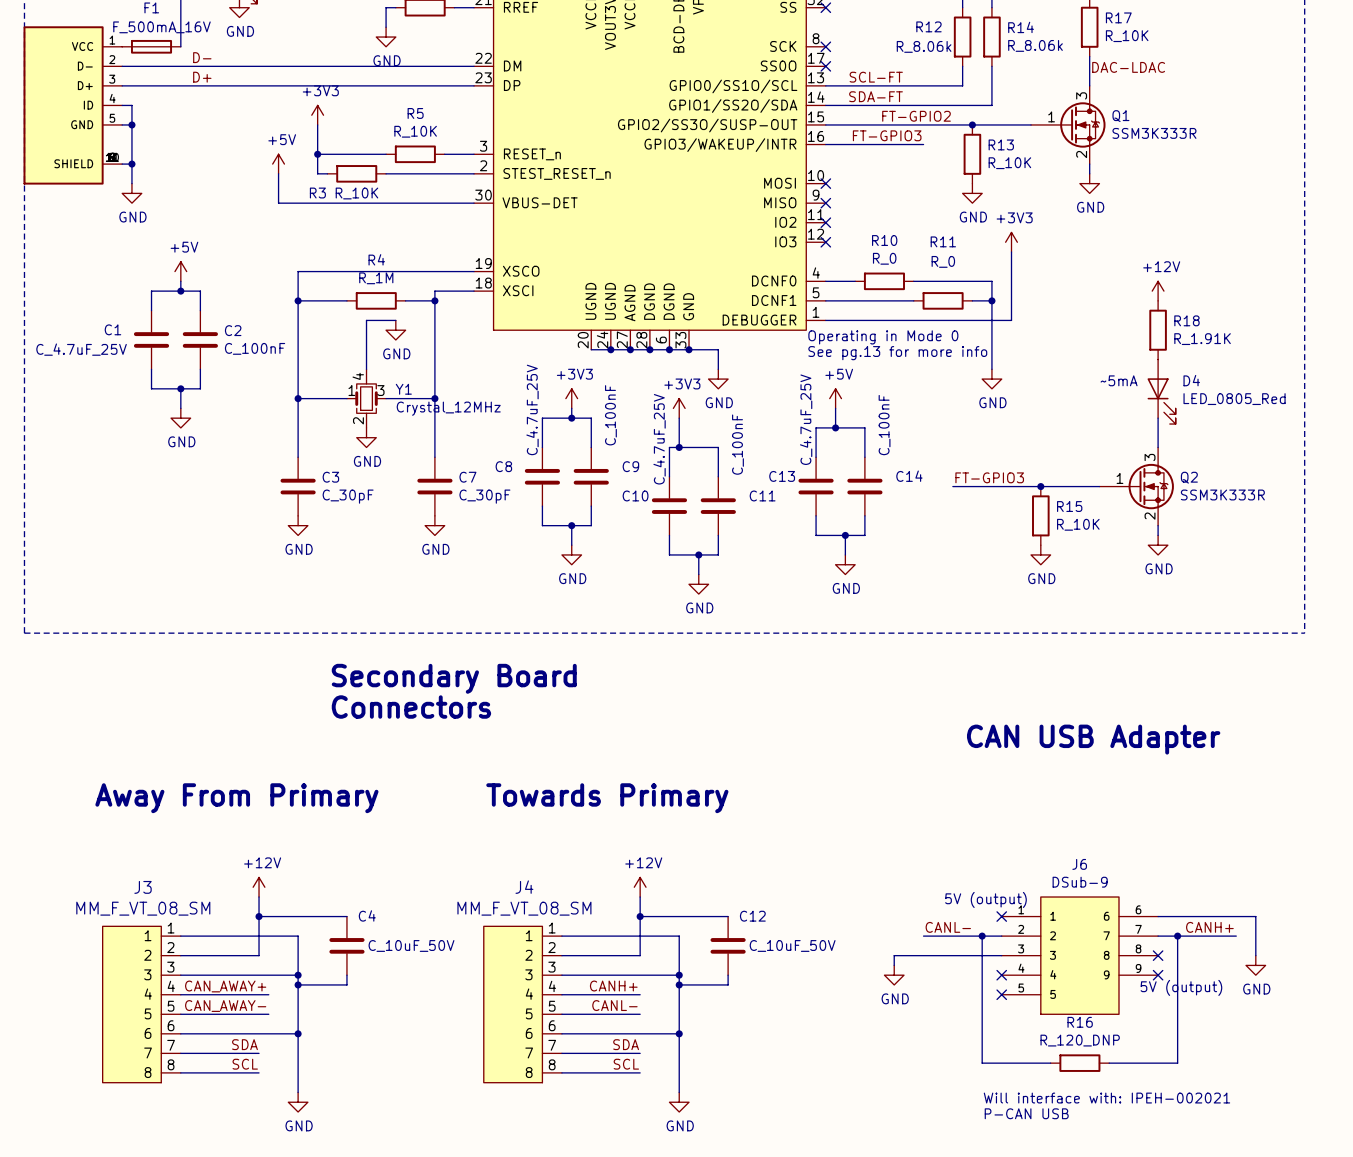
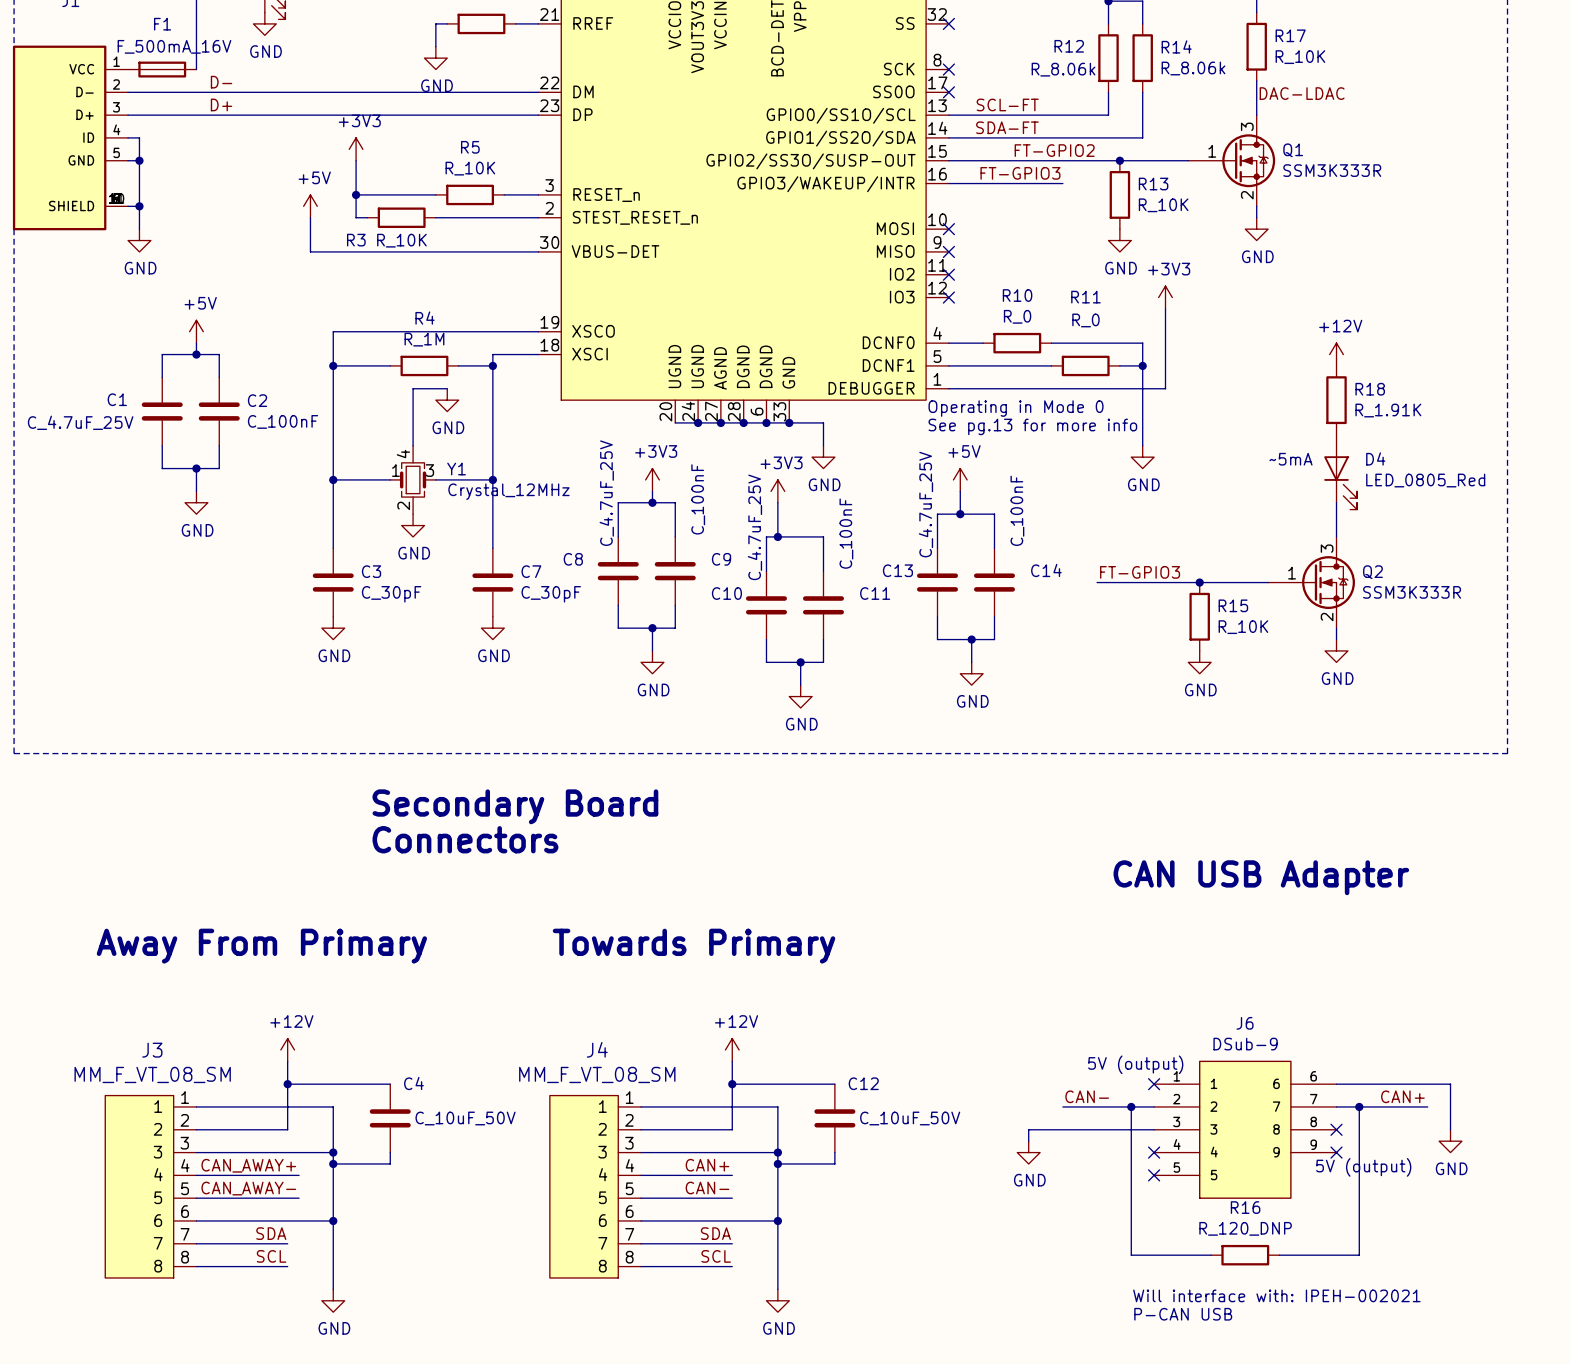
label: CANL- (948, 927) -> CAN- (1087, 1096)
label: CANH+ (1209, 927) -> CAN+ (1402, 1096)
label: CANH+ (613, 986) -> CAN+ (707, 1165)
label: CANL- (614, 1005) -> CAN- (707, 1188)

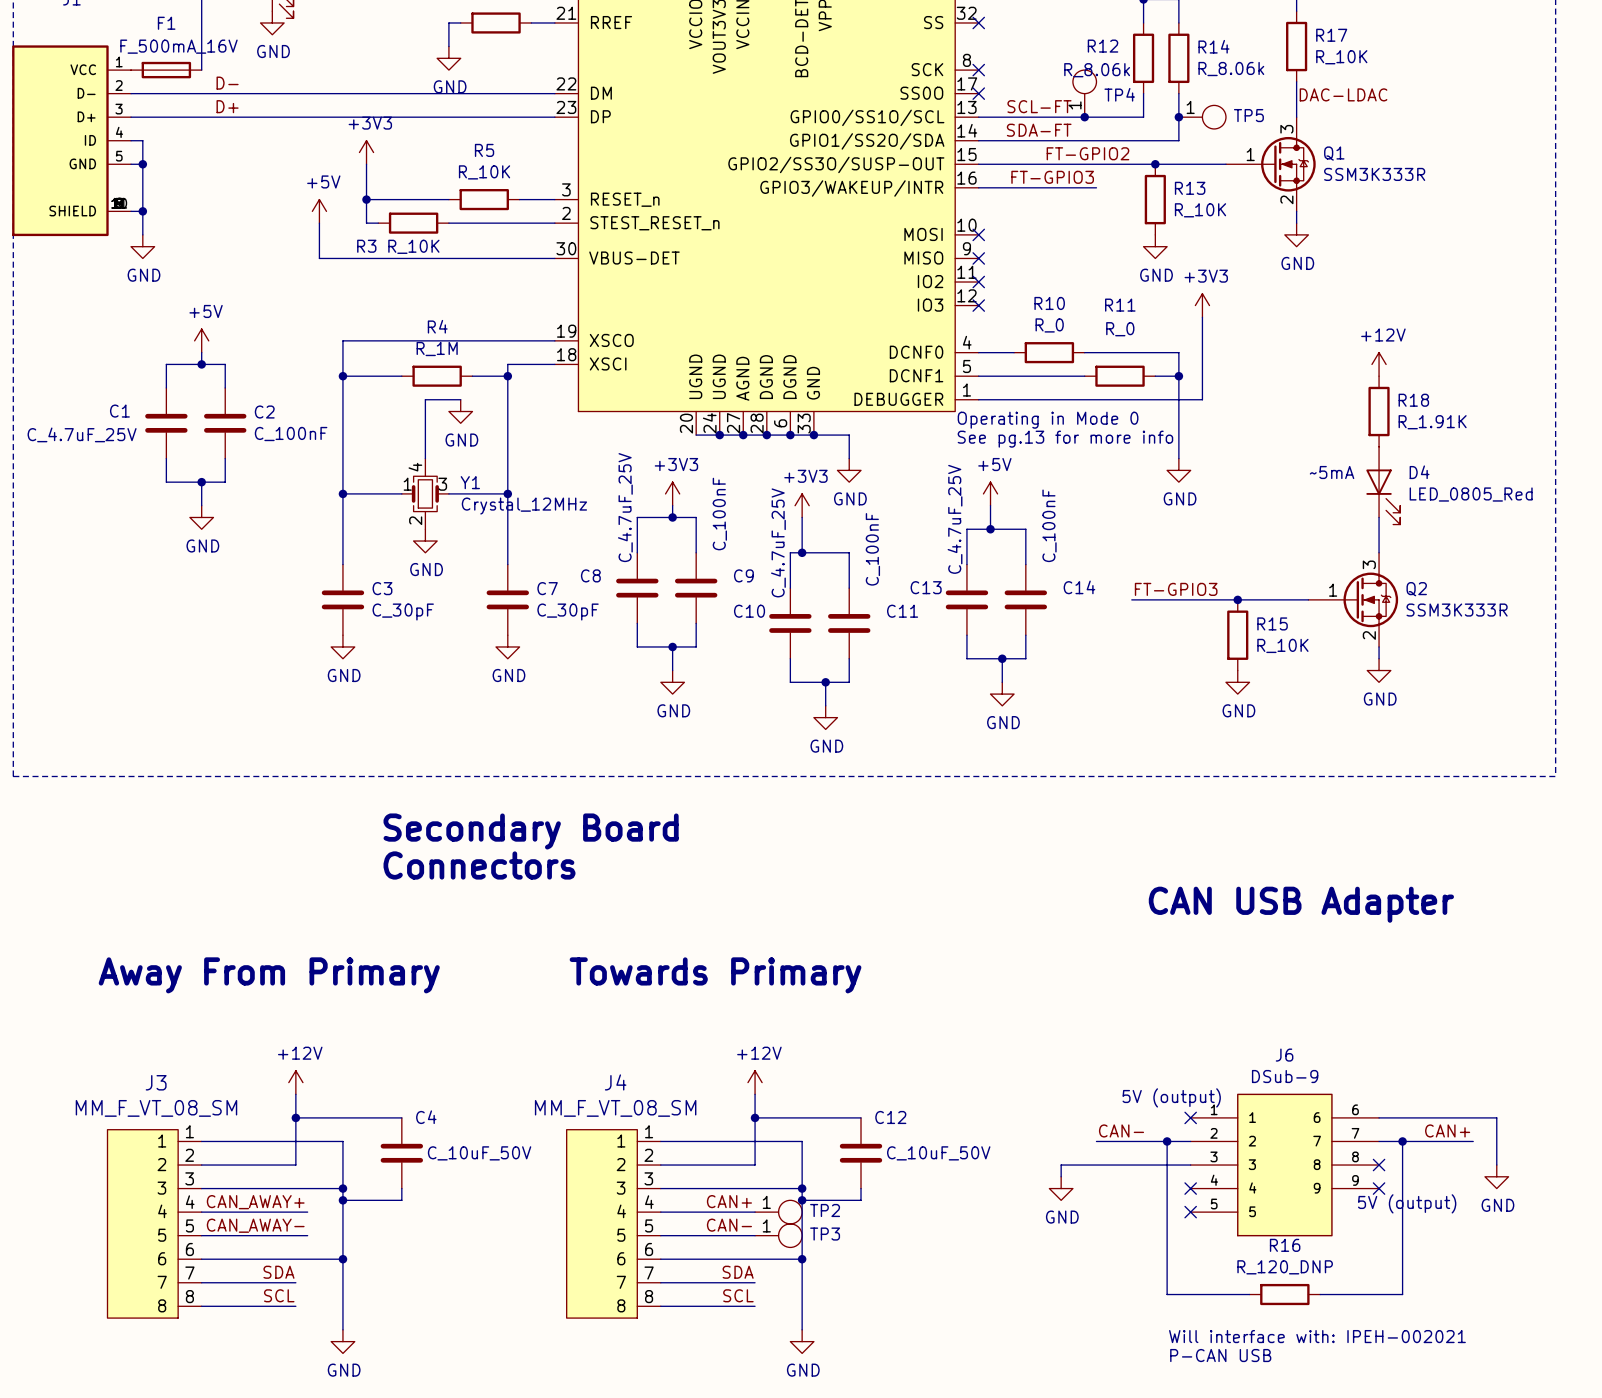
TP4: none -> (1084, 93)
junction: none -> (1084, 117)
junction: none -> (1178, 117)
TP5: none -> (1202, 117)
TP2: none -> (778, 1212)
TP3: none -> (778, 1235)

